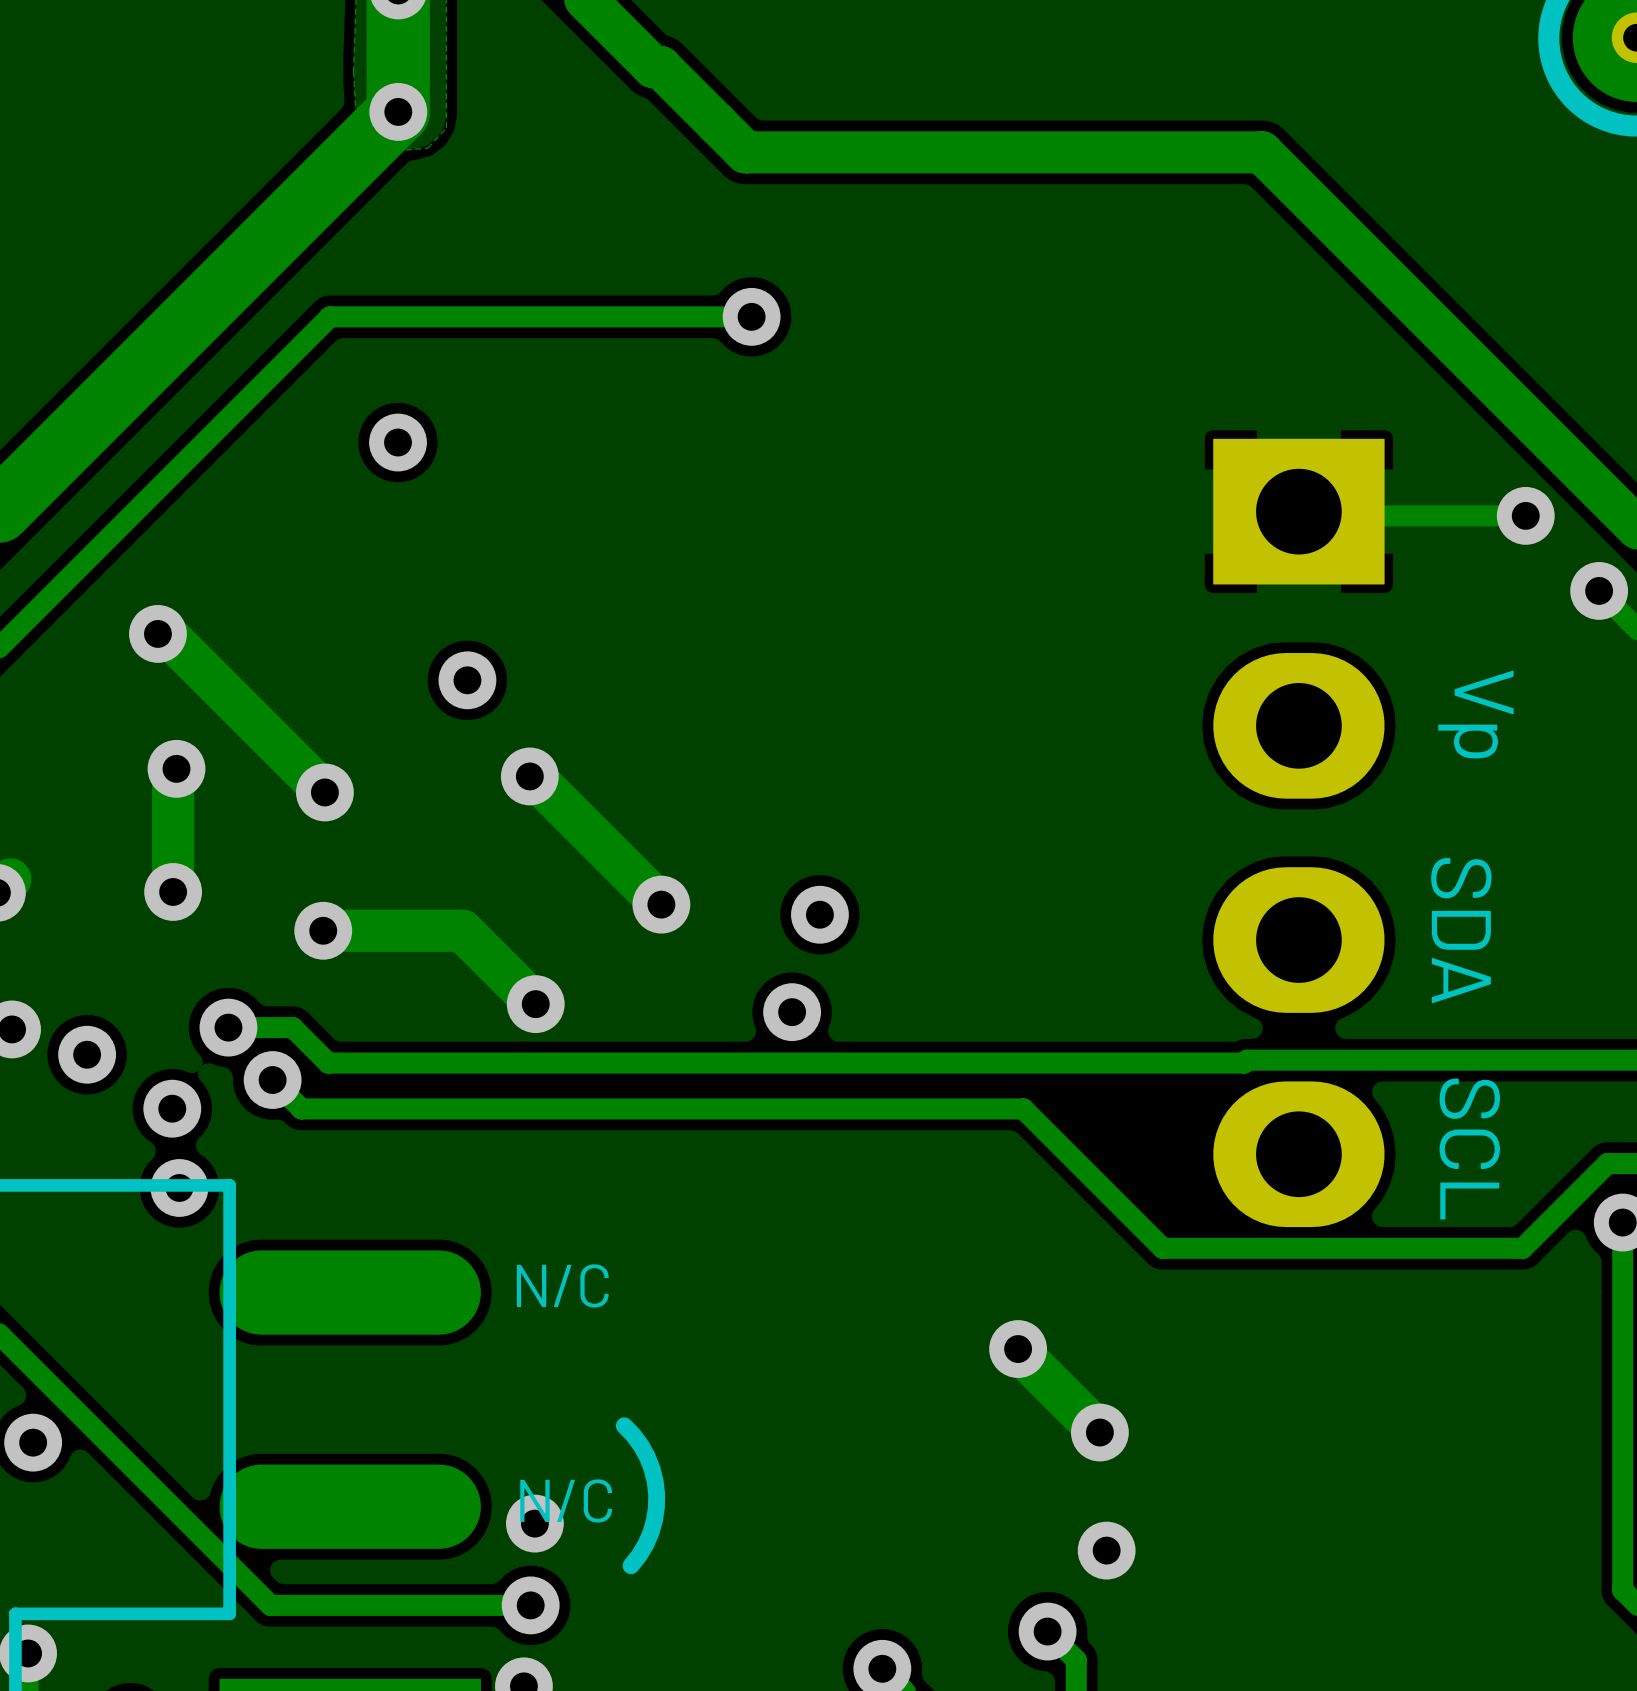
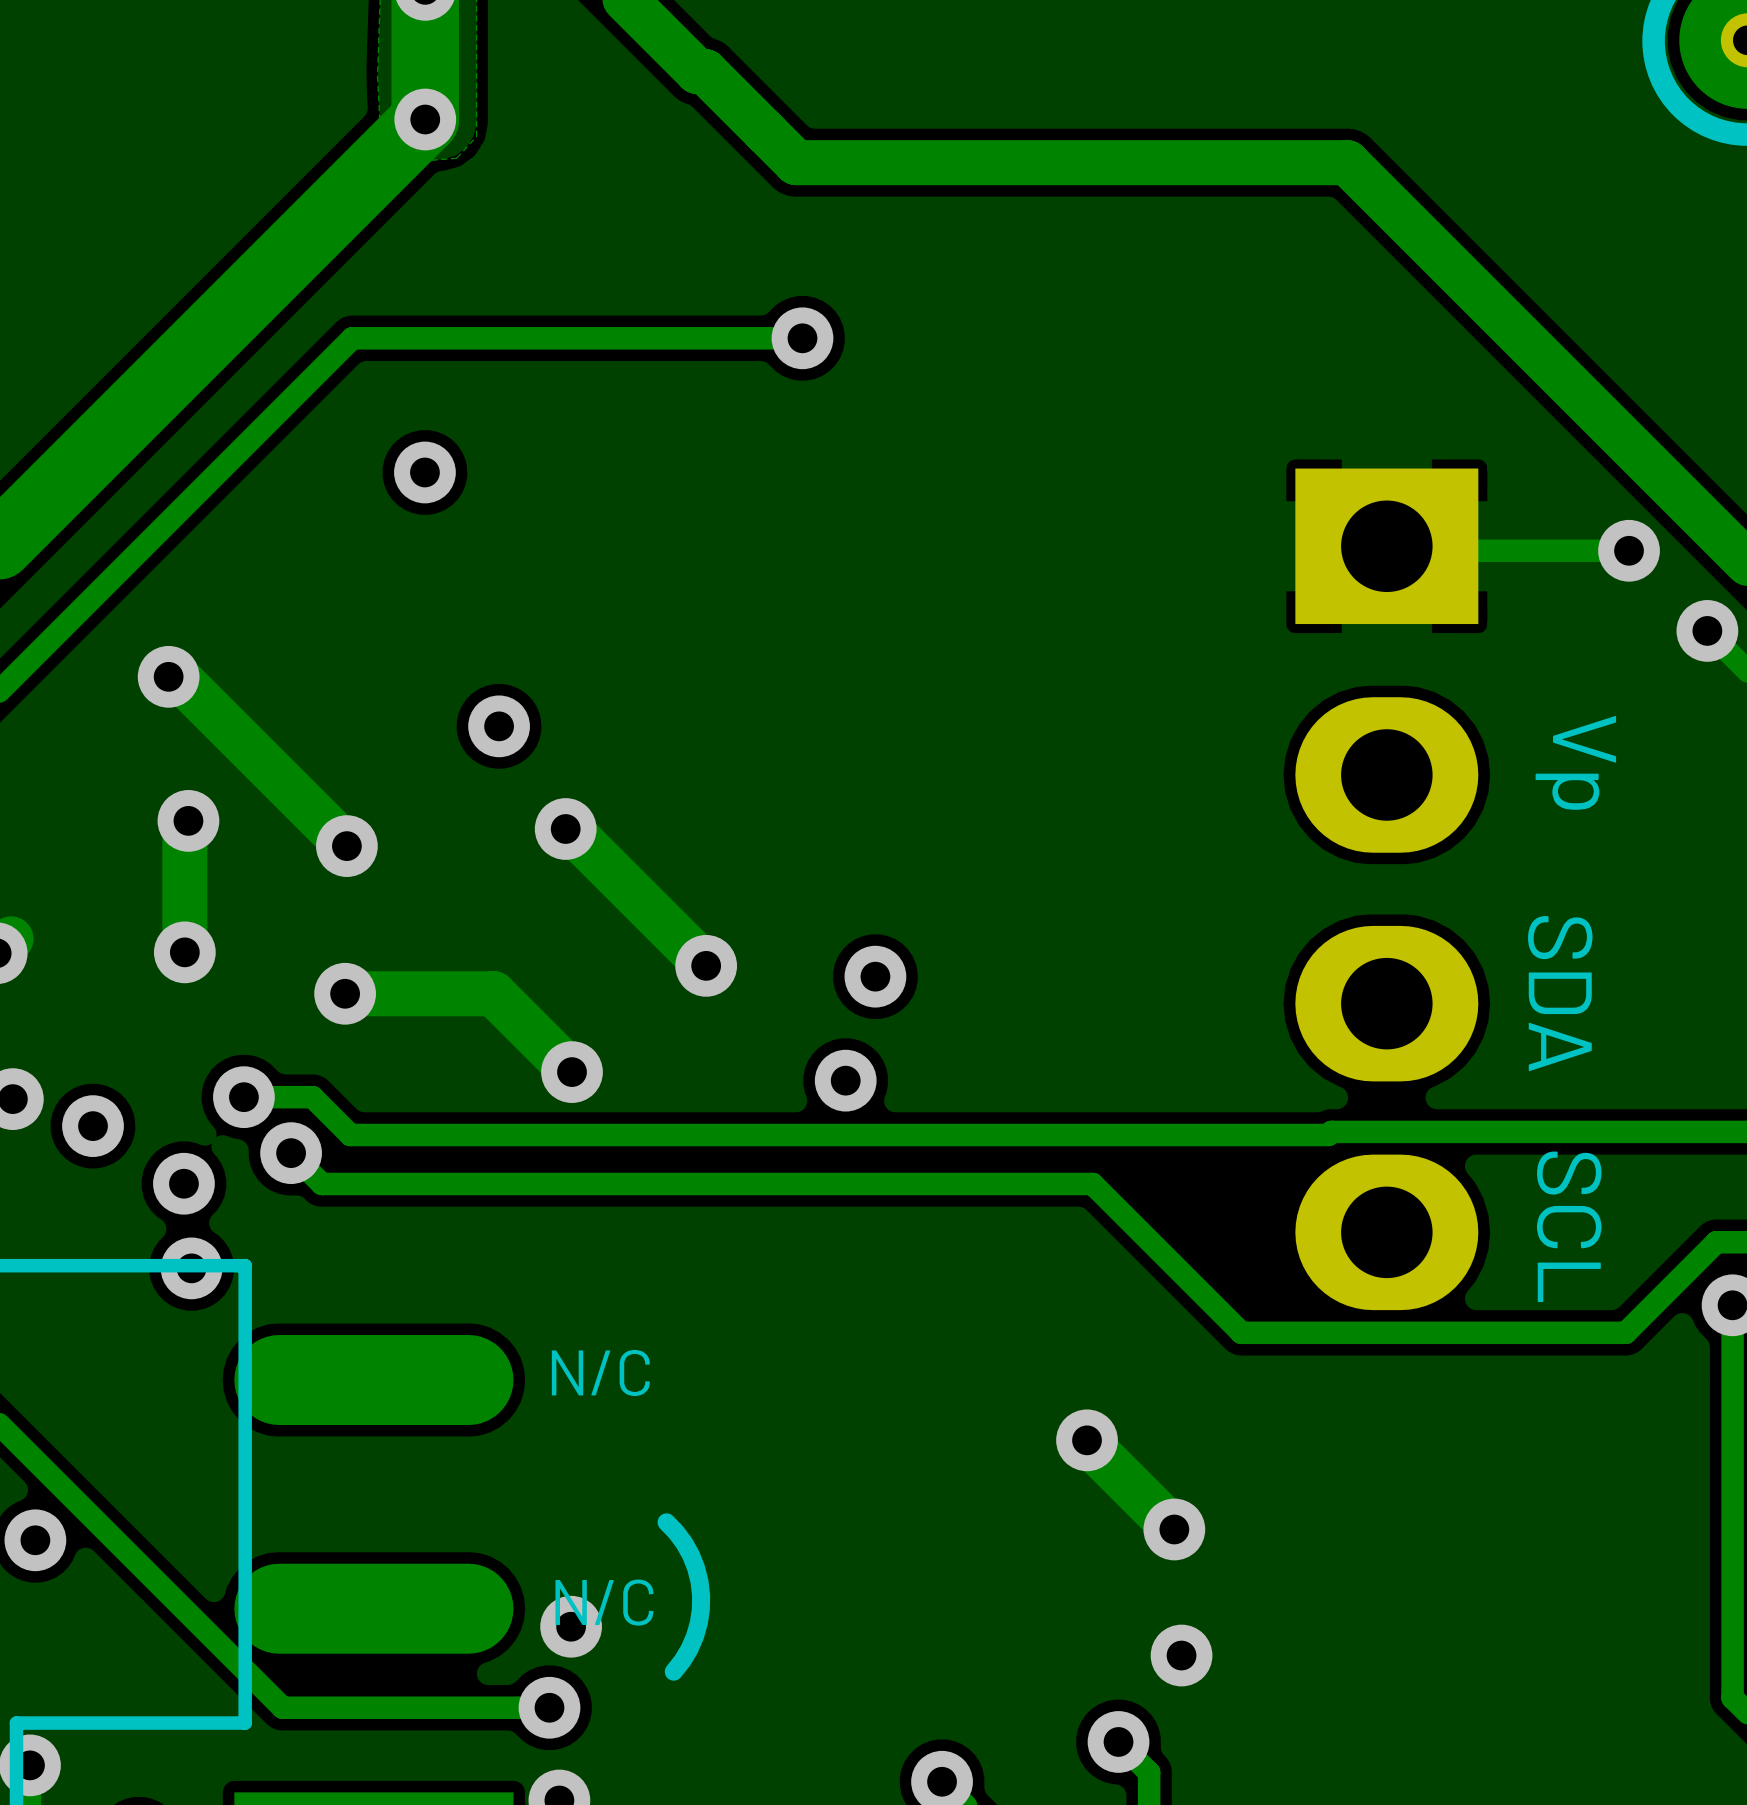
track: (264, 1599) (270, 1605) (530, 1605) -> (282, 1707) (549, 1707)
via position: (530, 1605) -> (549, 1707)

